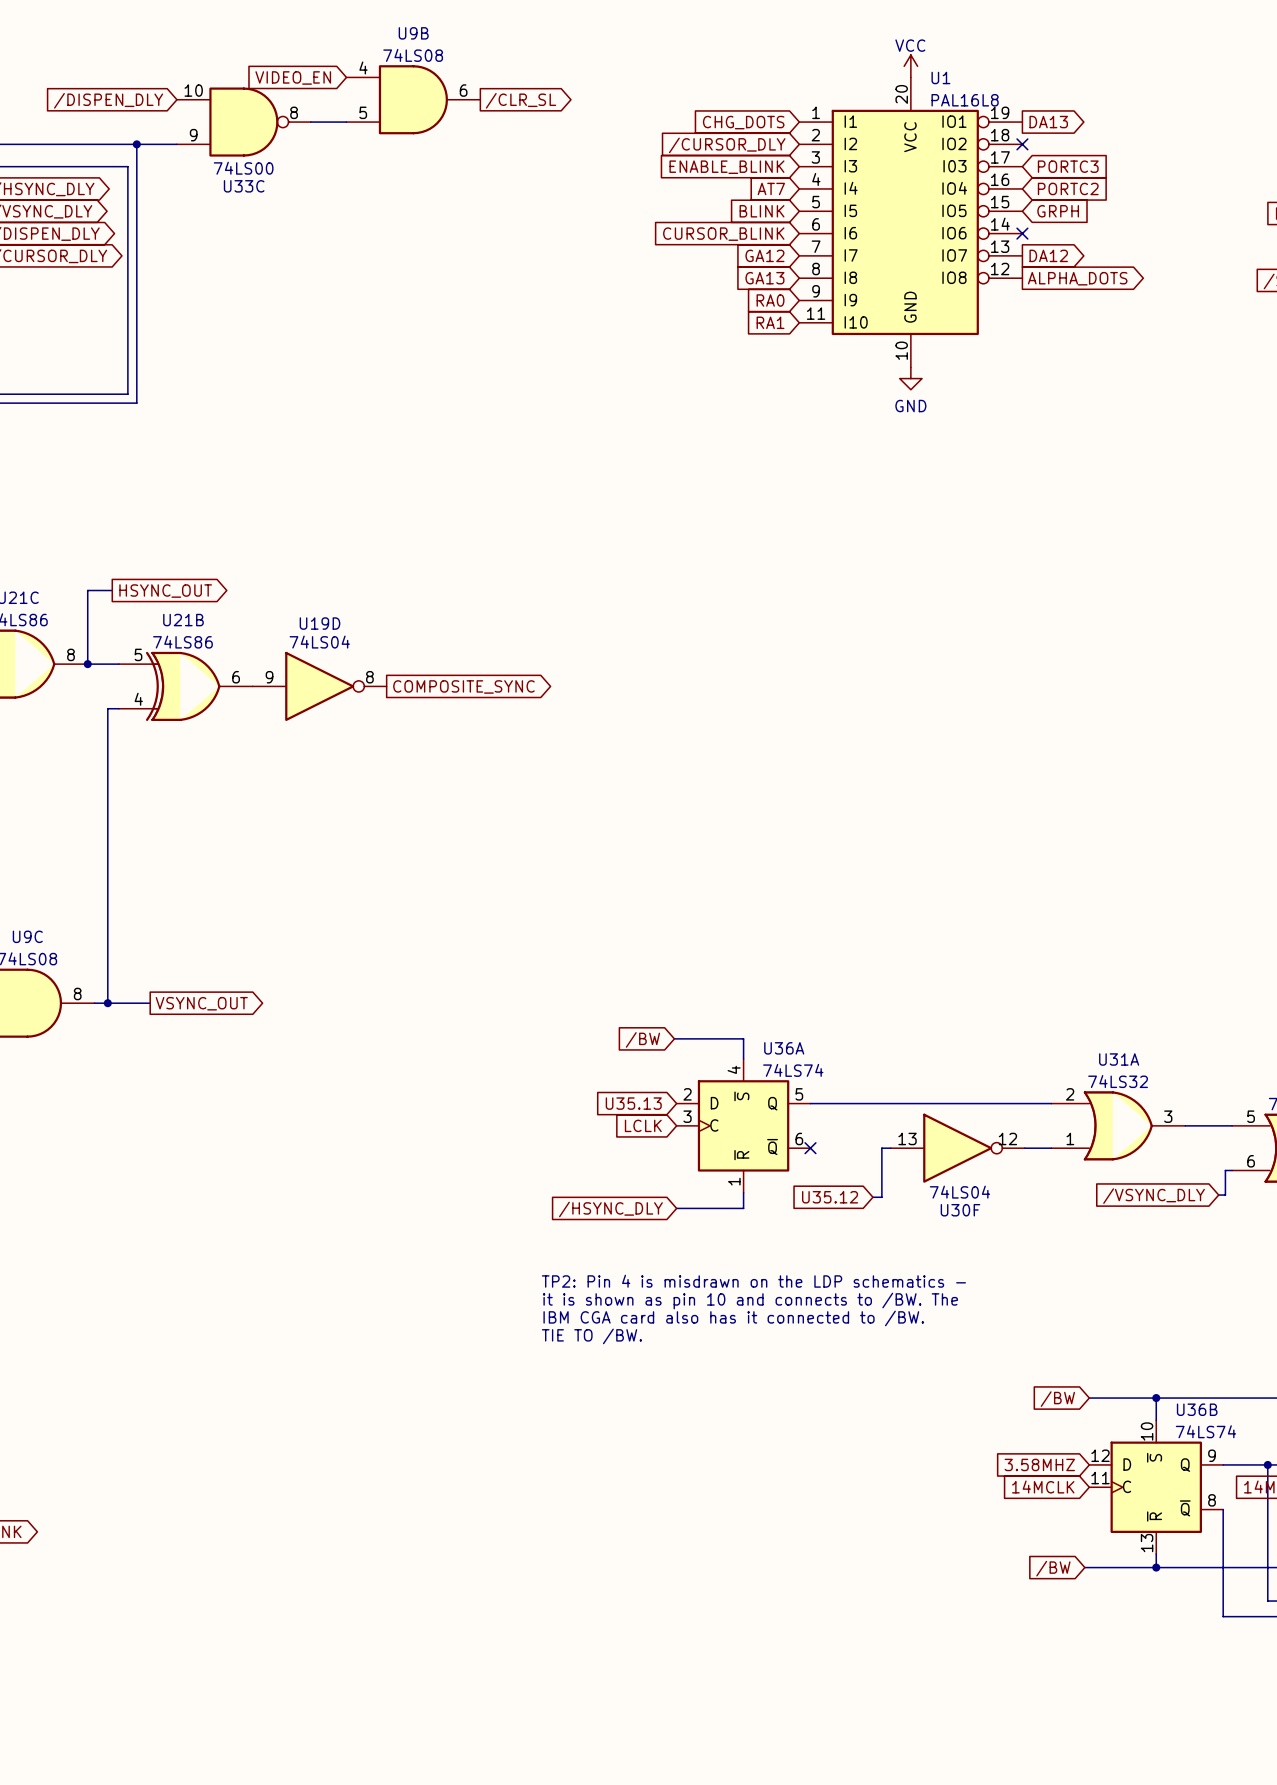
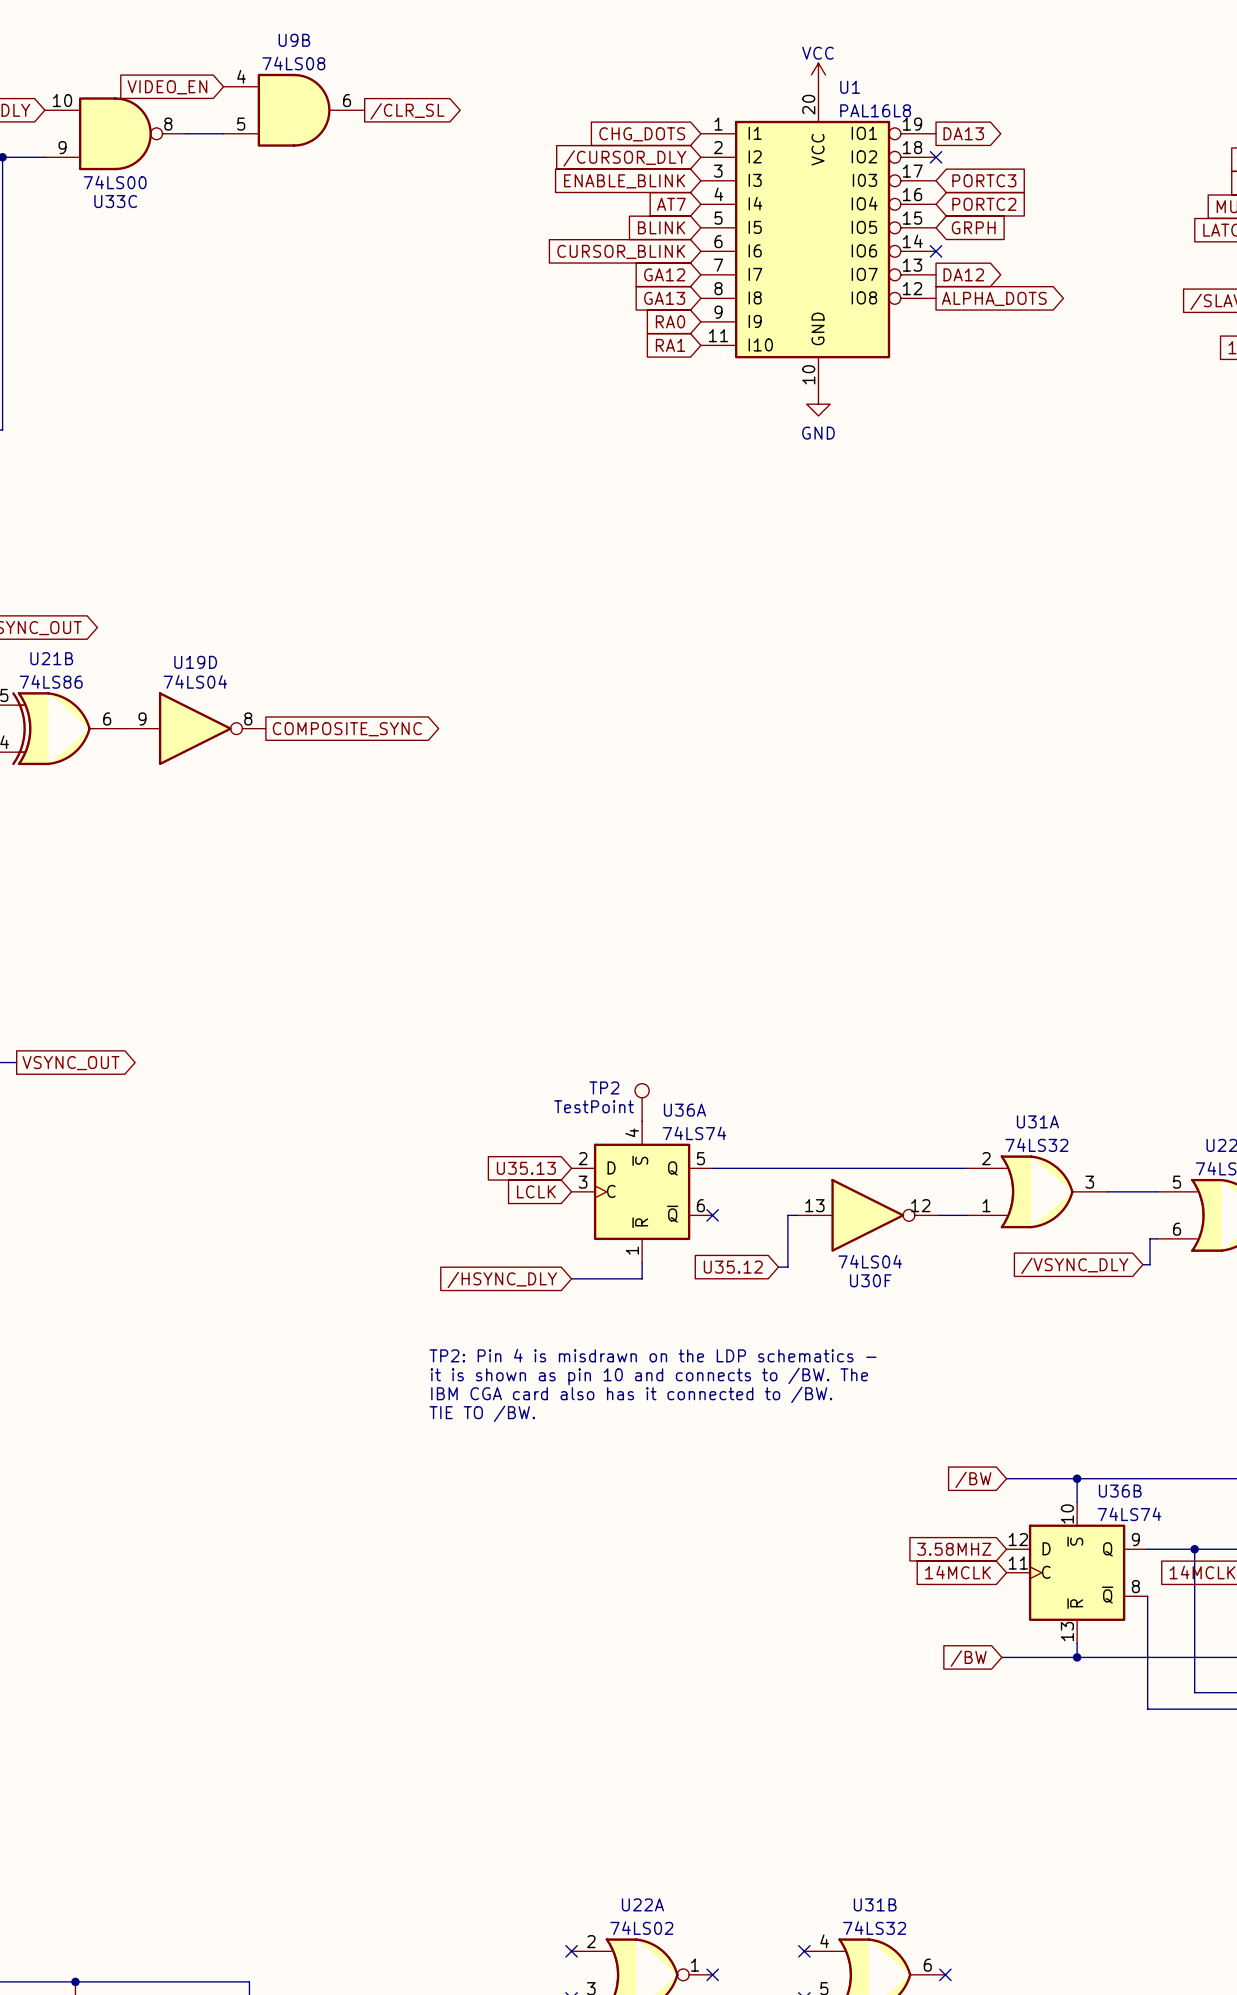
wire: (674, 1038) (743, 1038) (743, 1058) -> none
global label: /BW (642, 1039) -> none
TP2: none -> TestPoint (642, 1102)

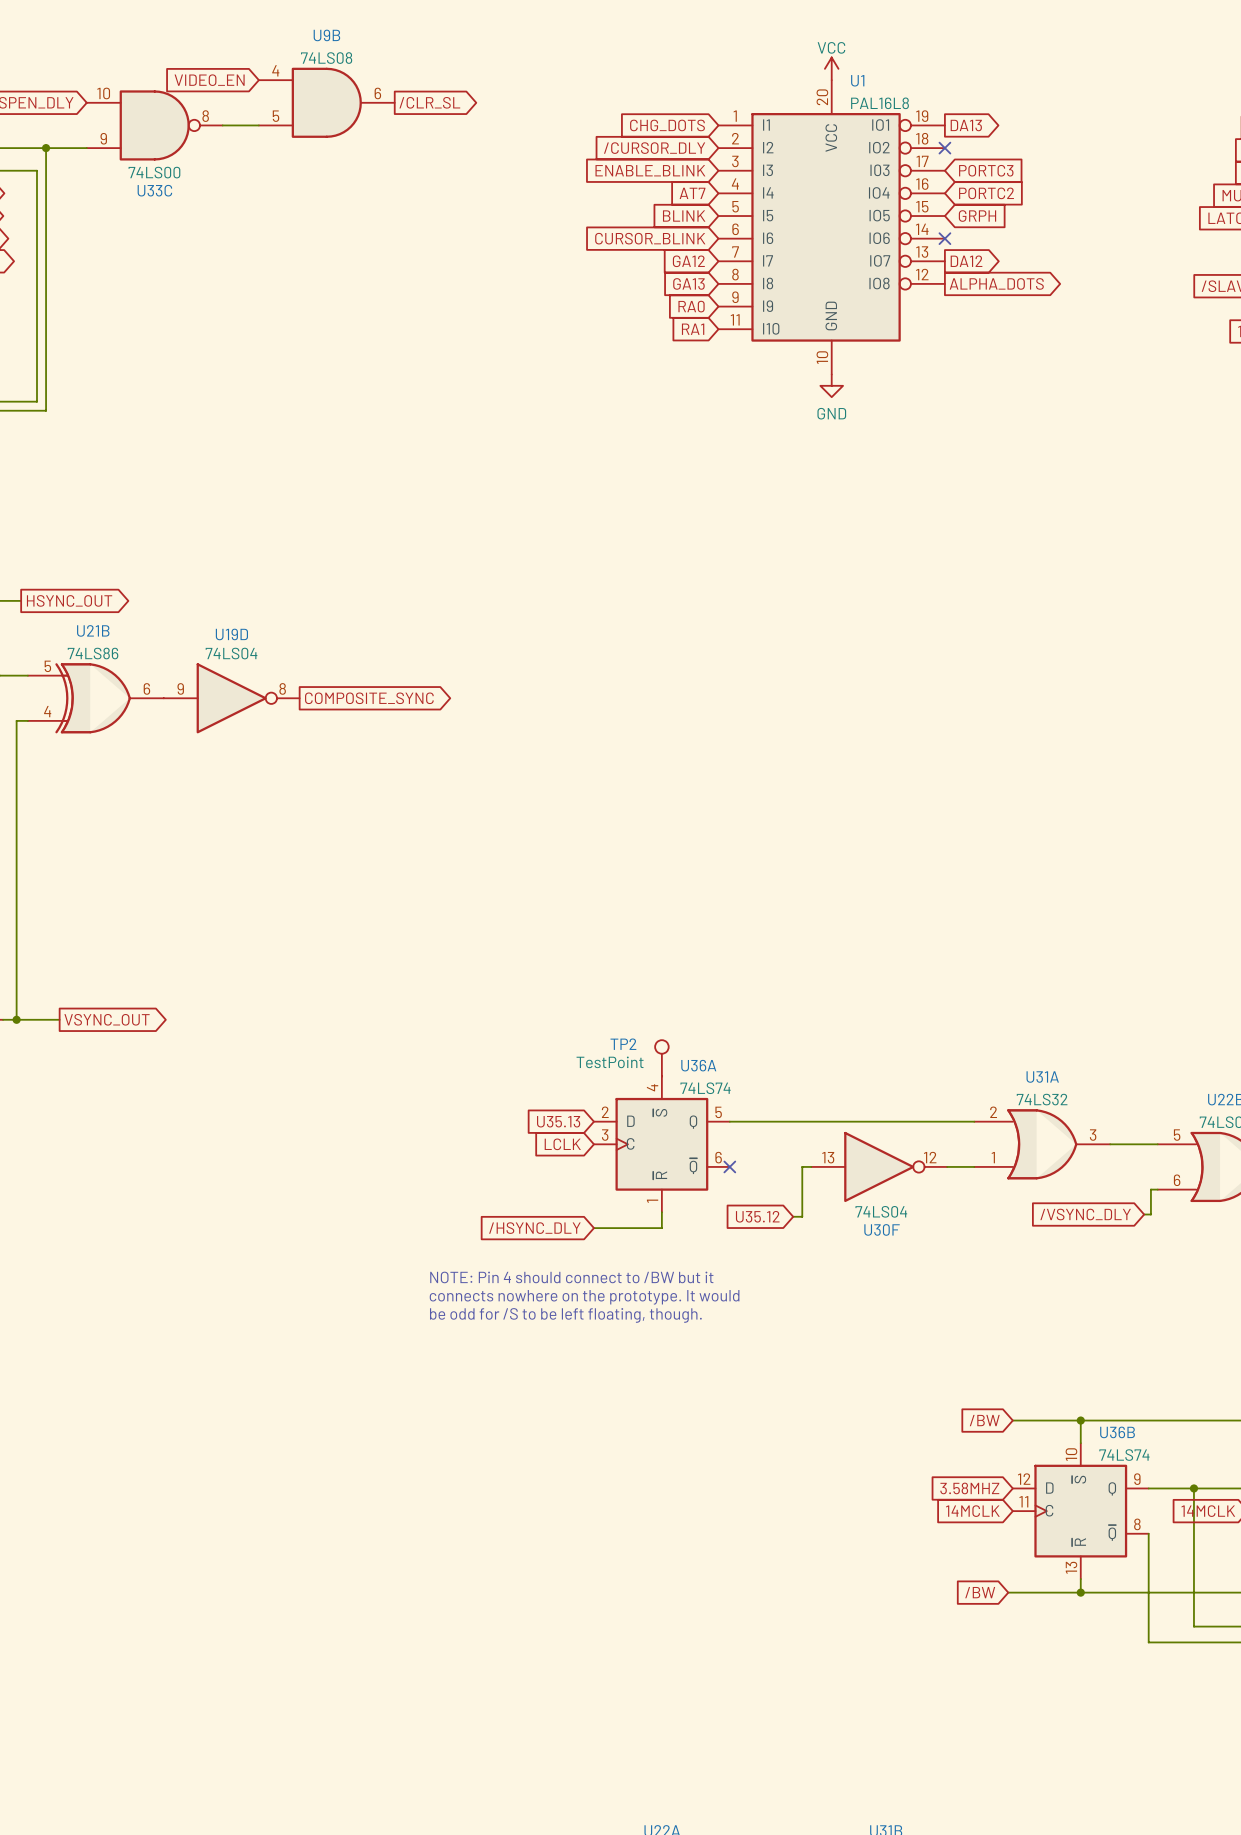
text: none -> NOTE: Pin 4 should connect to /BW but it (571, 1277)
text: none -> connects nowhere on the prototype. It would (584, 1297)
text: TP2: Pin 4 is misdrawn on the LDP schematics - (653, 1355) -> none
text: none -> be odd for /S to be left floating, though. (565, 1315)
text: it is shown as pin 10 and connects to /BW. The (649, 1376) -> none
text: IBM CGA card also has it connected to /BW. (631, 1394) -> none
text: TIE TO /BW. (482, 1413) -> none

